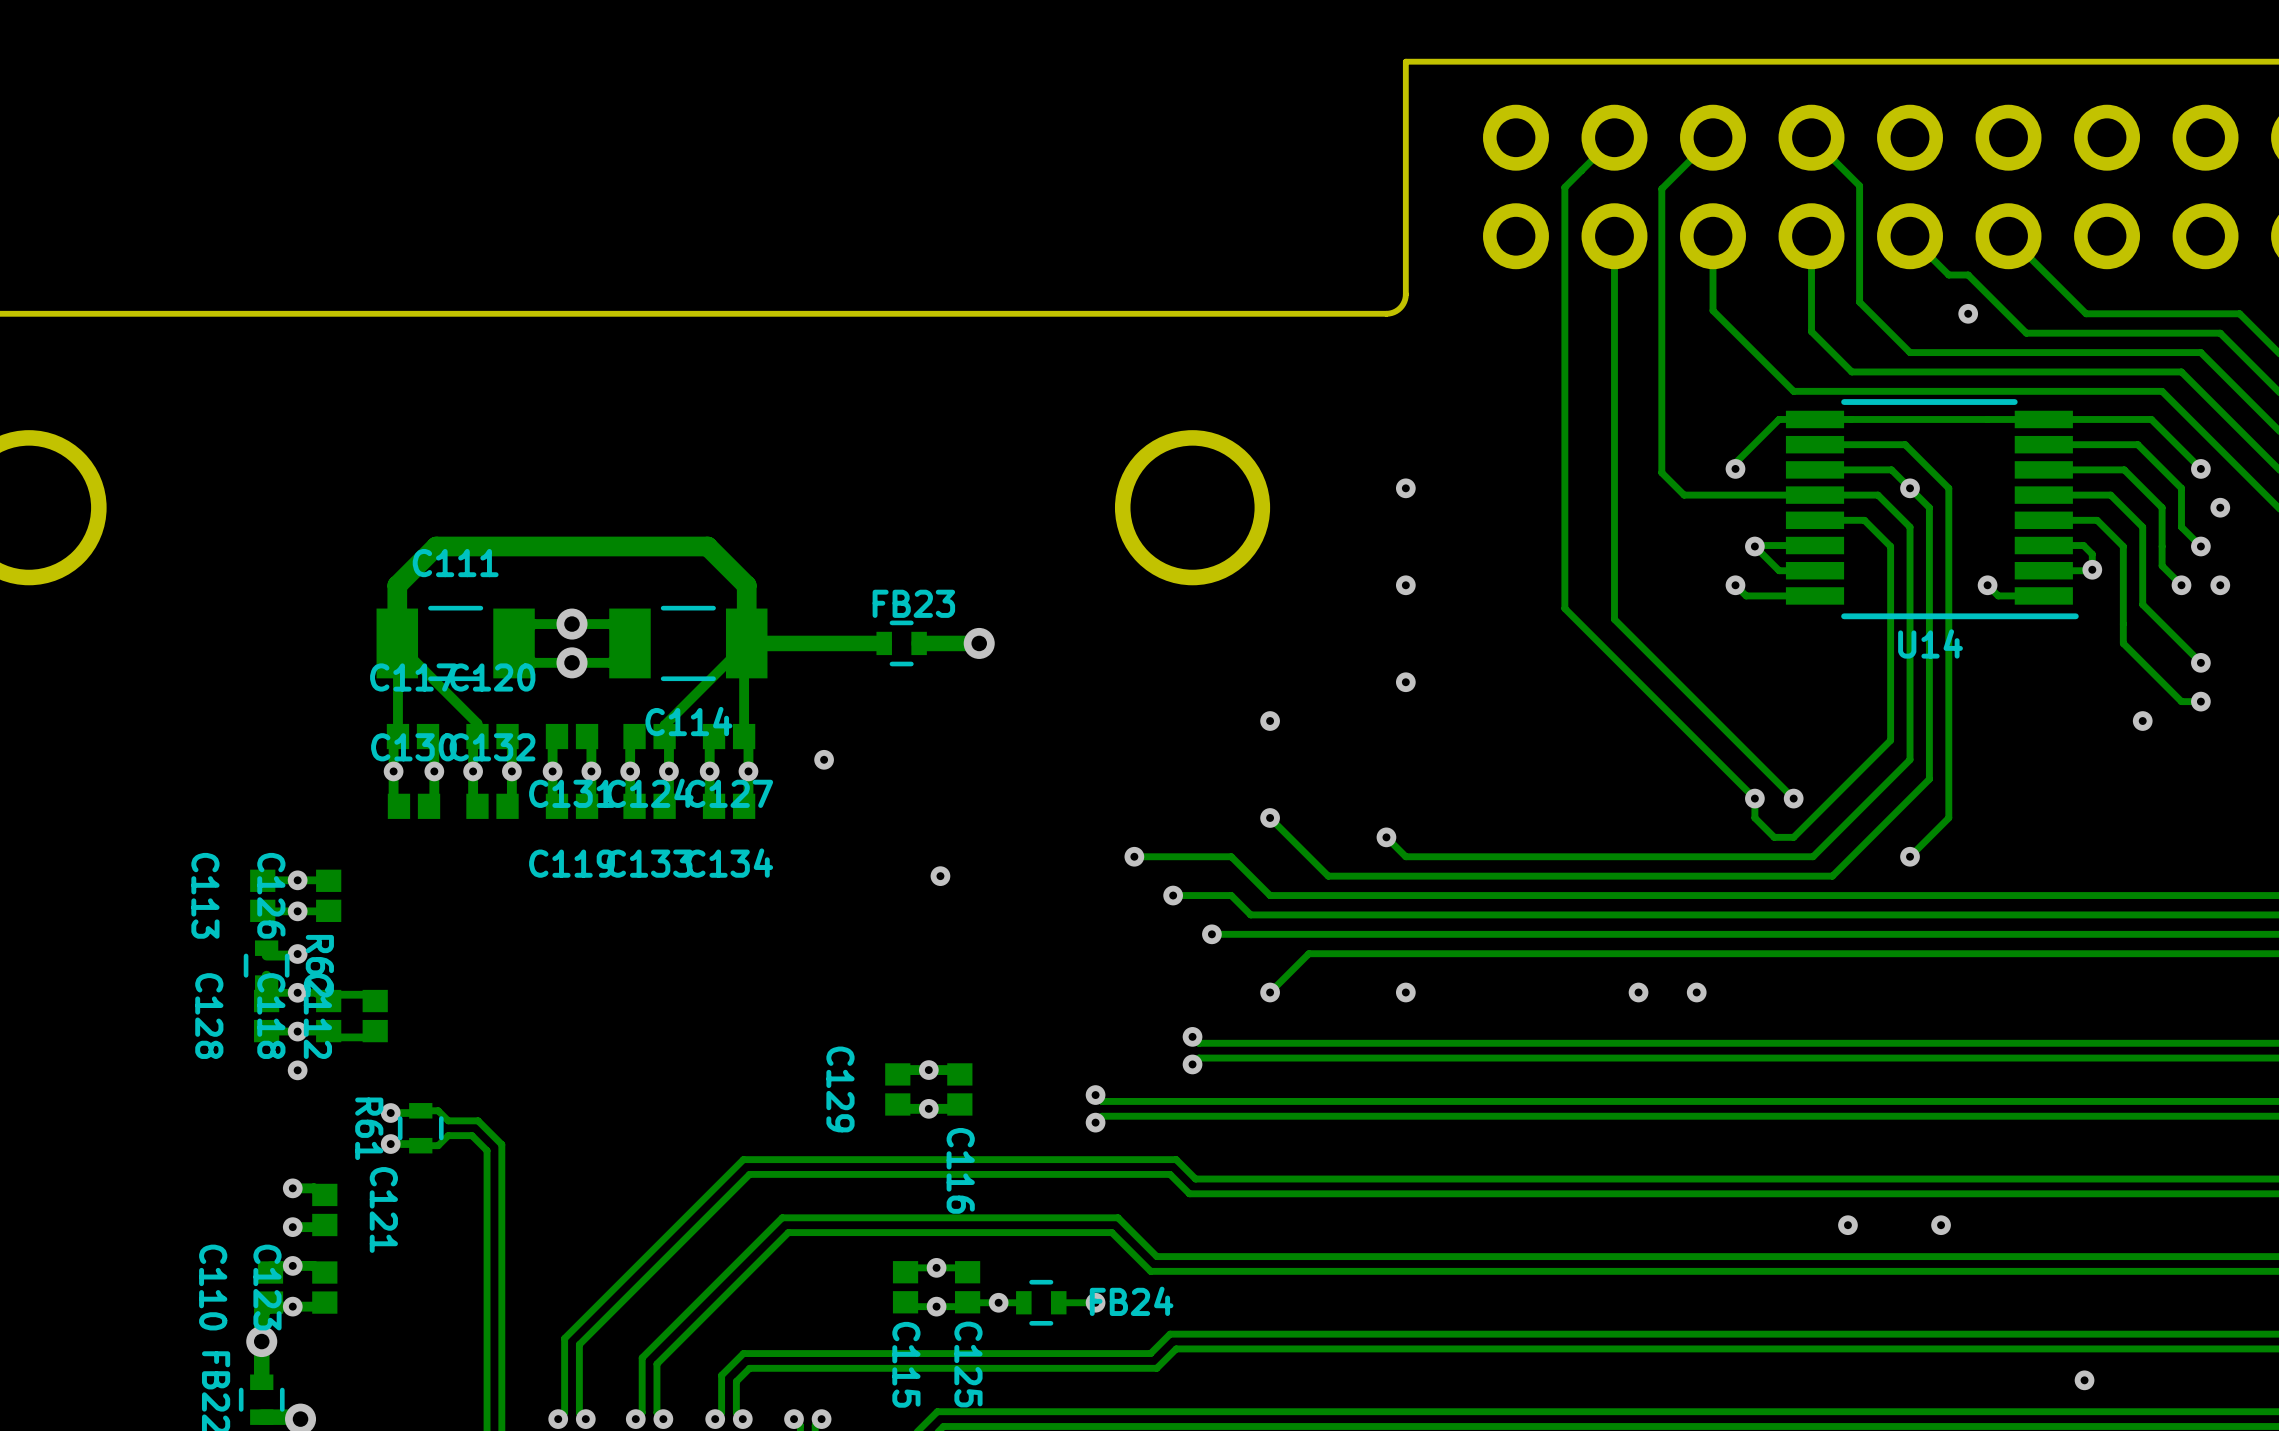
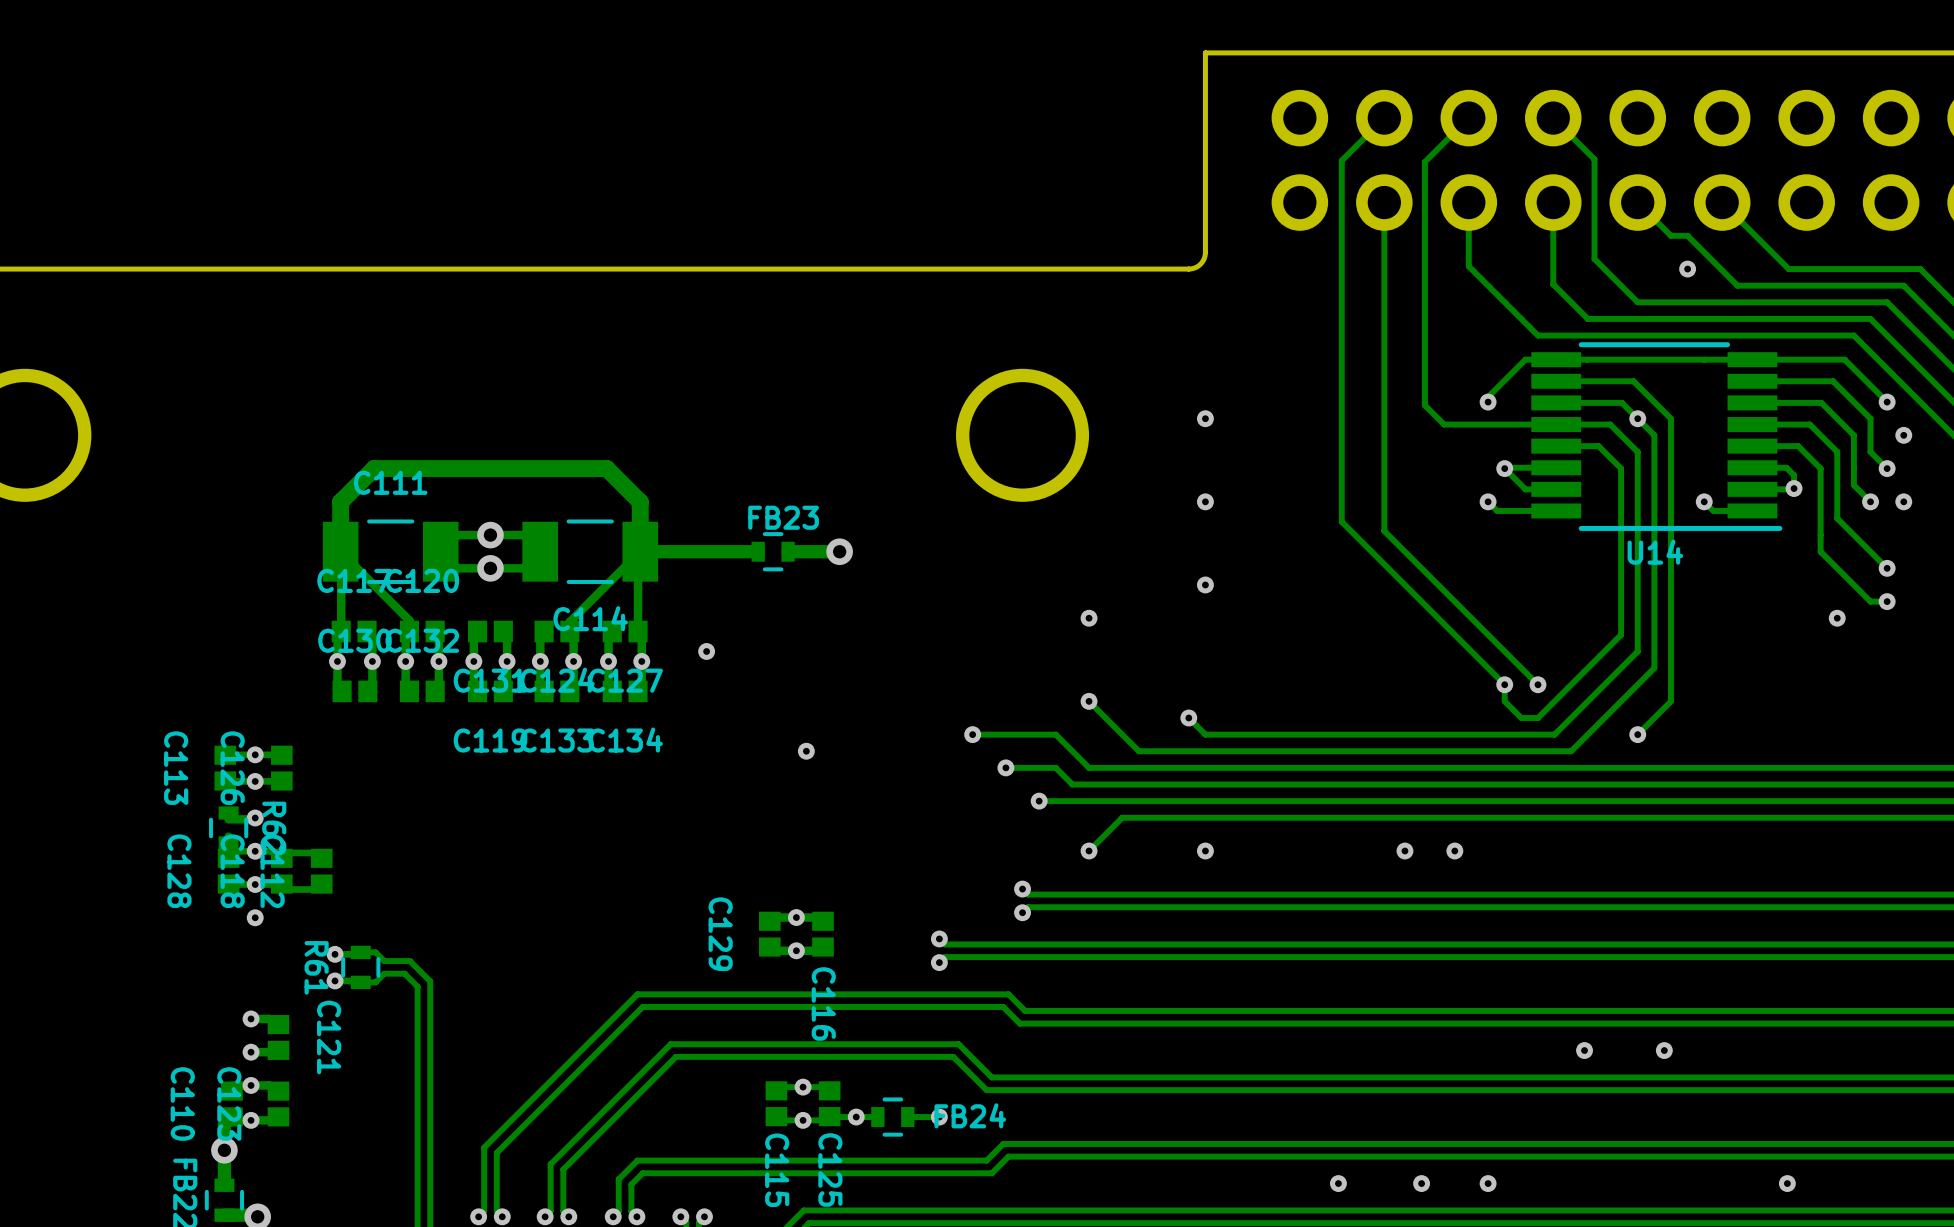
via: none -> (1338, 1183)
via: none -> (1421, 1183)
via: none -> (1488, 1183)

